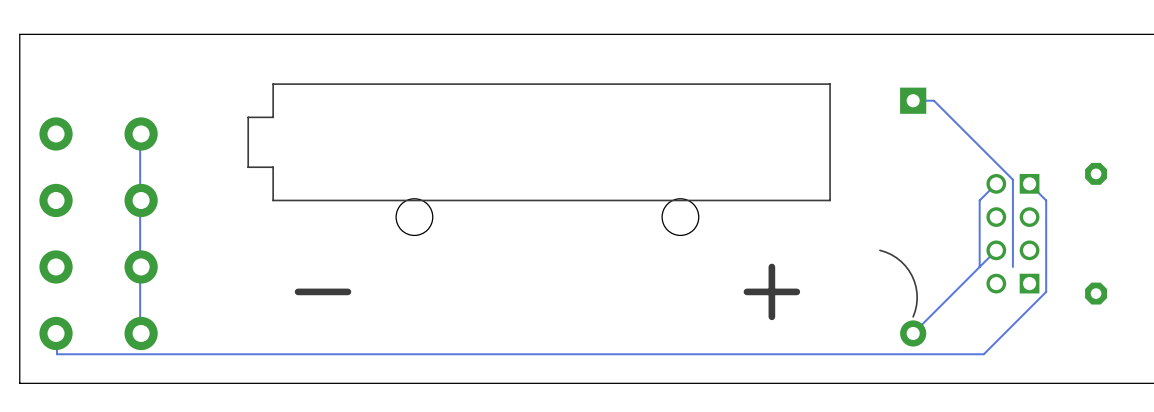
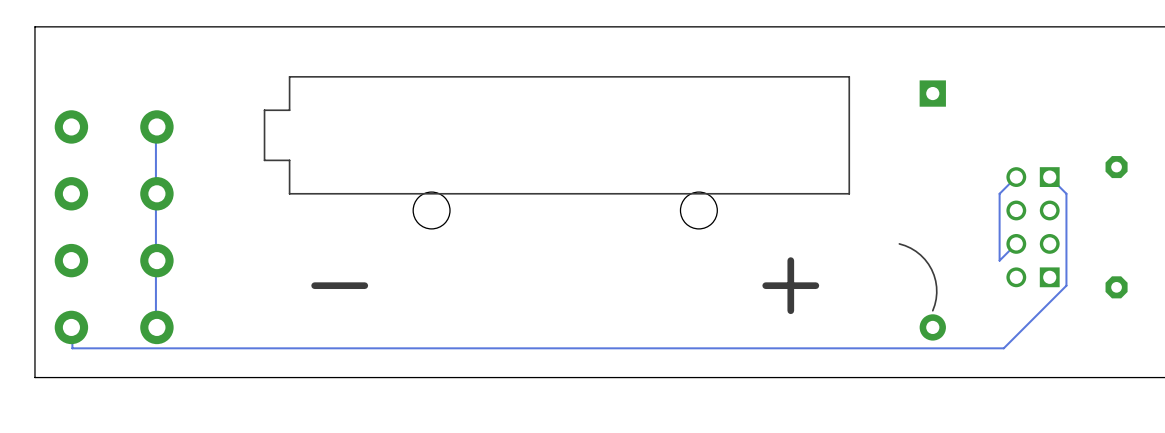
track: (913, 100) (933, 100) (1012, 179) (1012, 266) -> none
track: (979, 266) (913, 333) -> none

